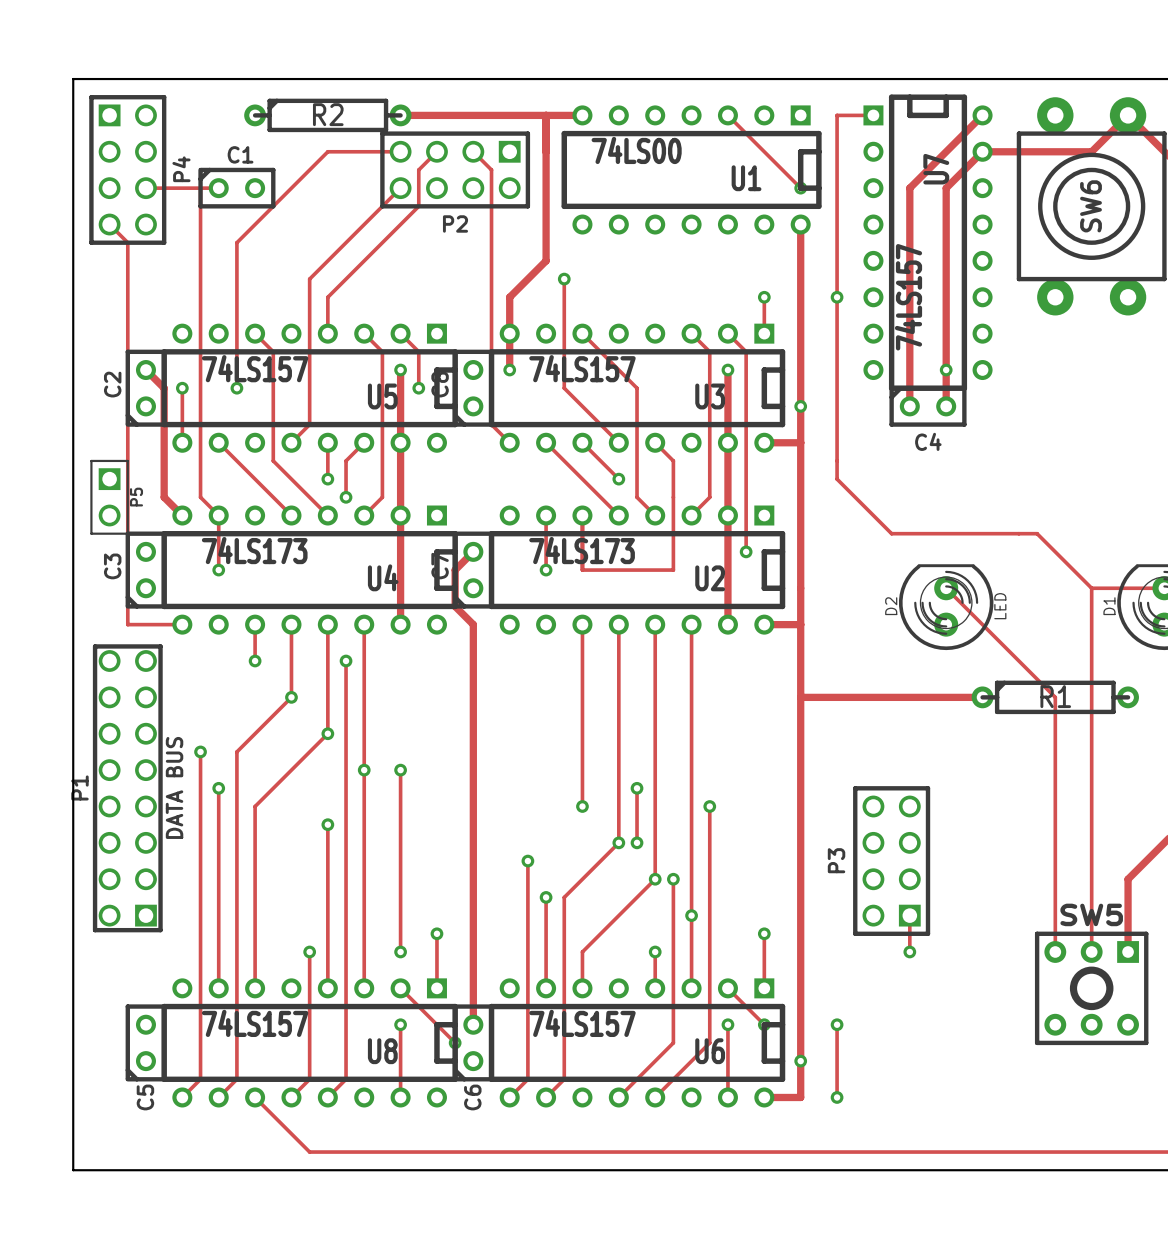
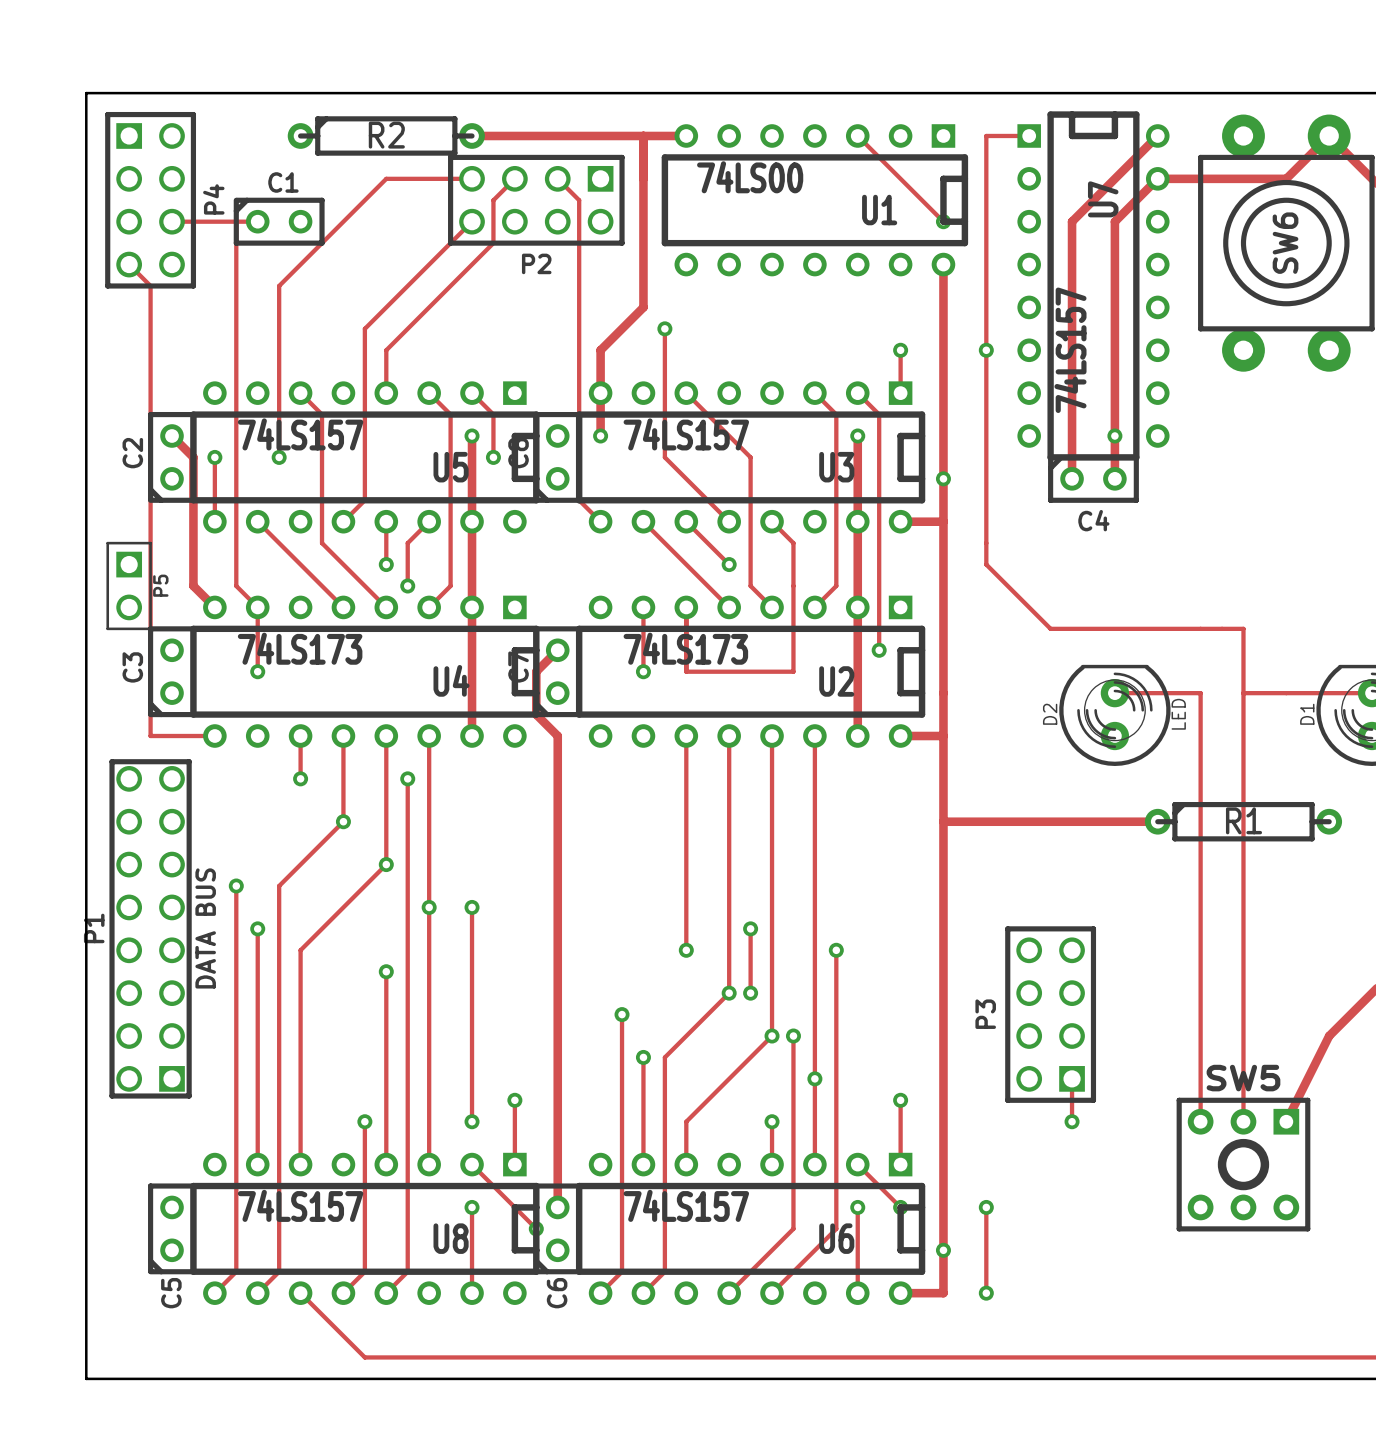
track: (1037, 533) (1091, 588) (1091, 951) -> none
track: (946, 588) (1055, 697) -> (1222, 628) (1243, 628) (1243, 821)
track: none -> (1114, 693) (1200, 693) (1200, 1121)
track: none -> (1243, 693) (1286, 693)
track: (1128, 879) (1128, 951) -> (1329, 1036) (1286, 1121)
SW5 position: (1091, 988) -> (1243, 1164)

